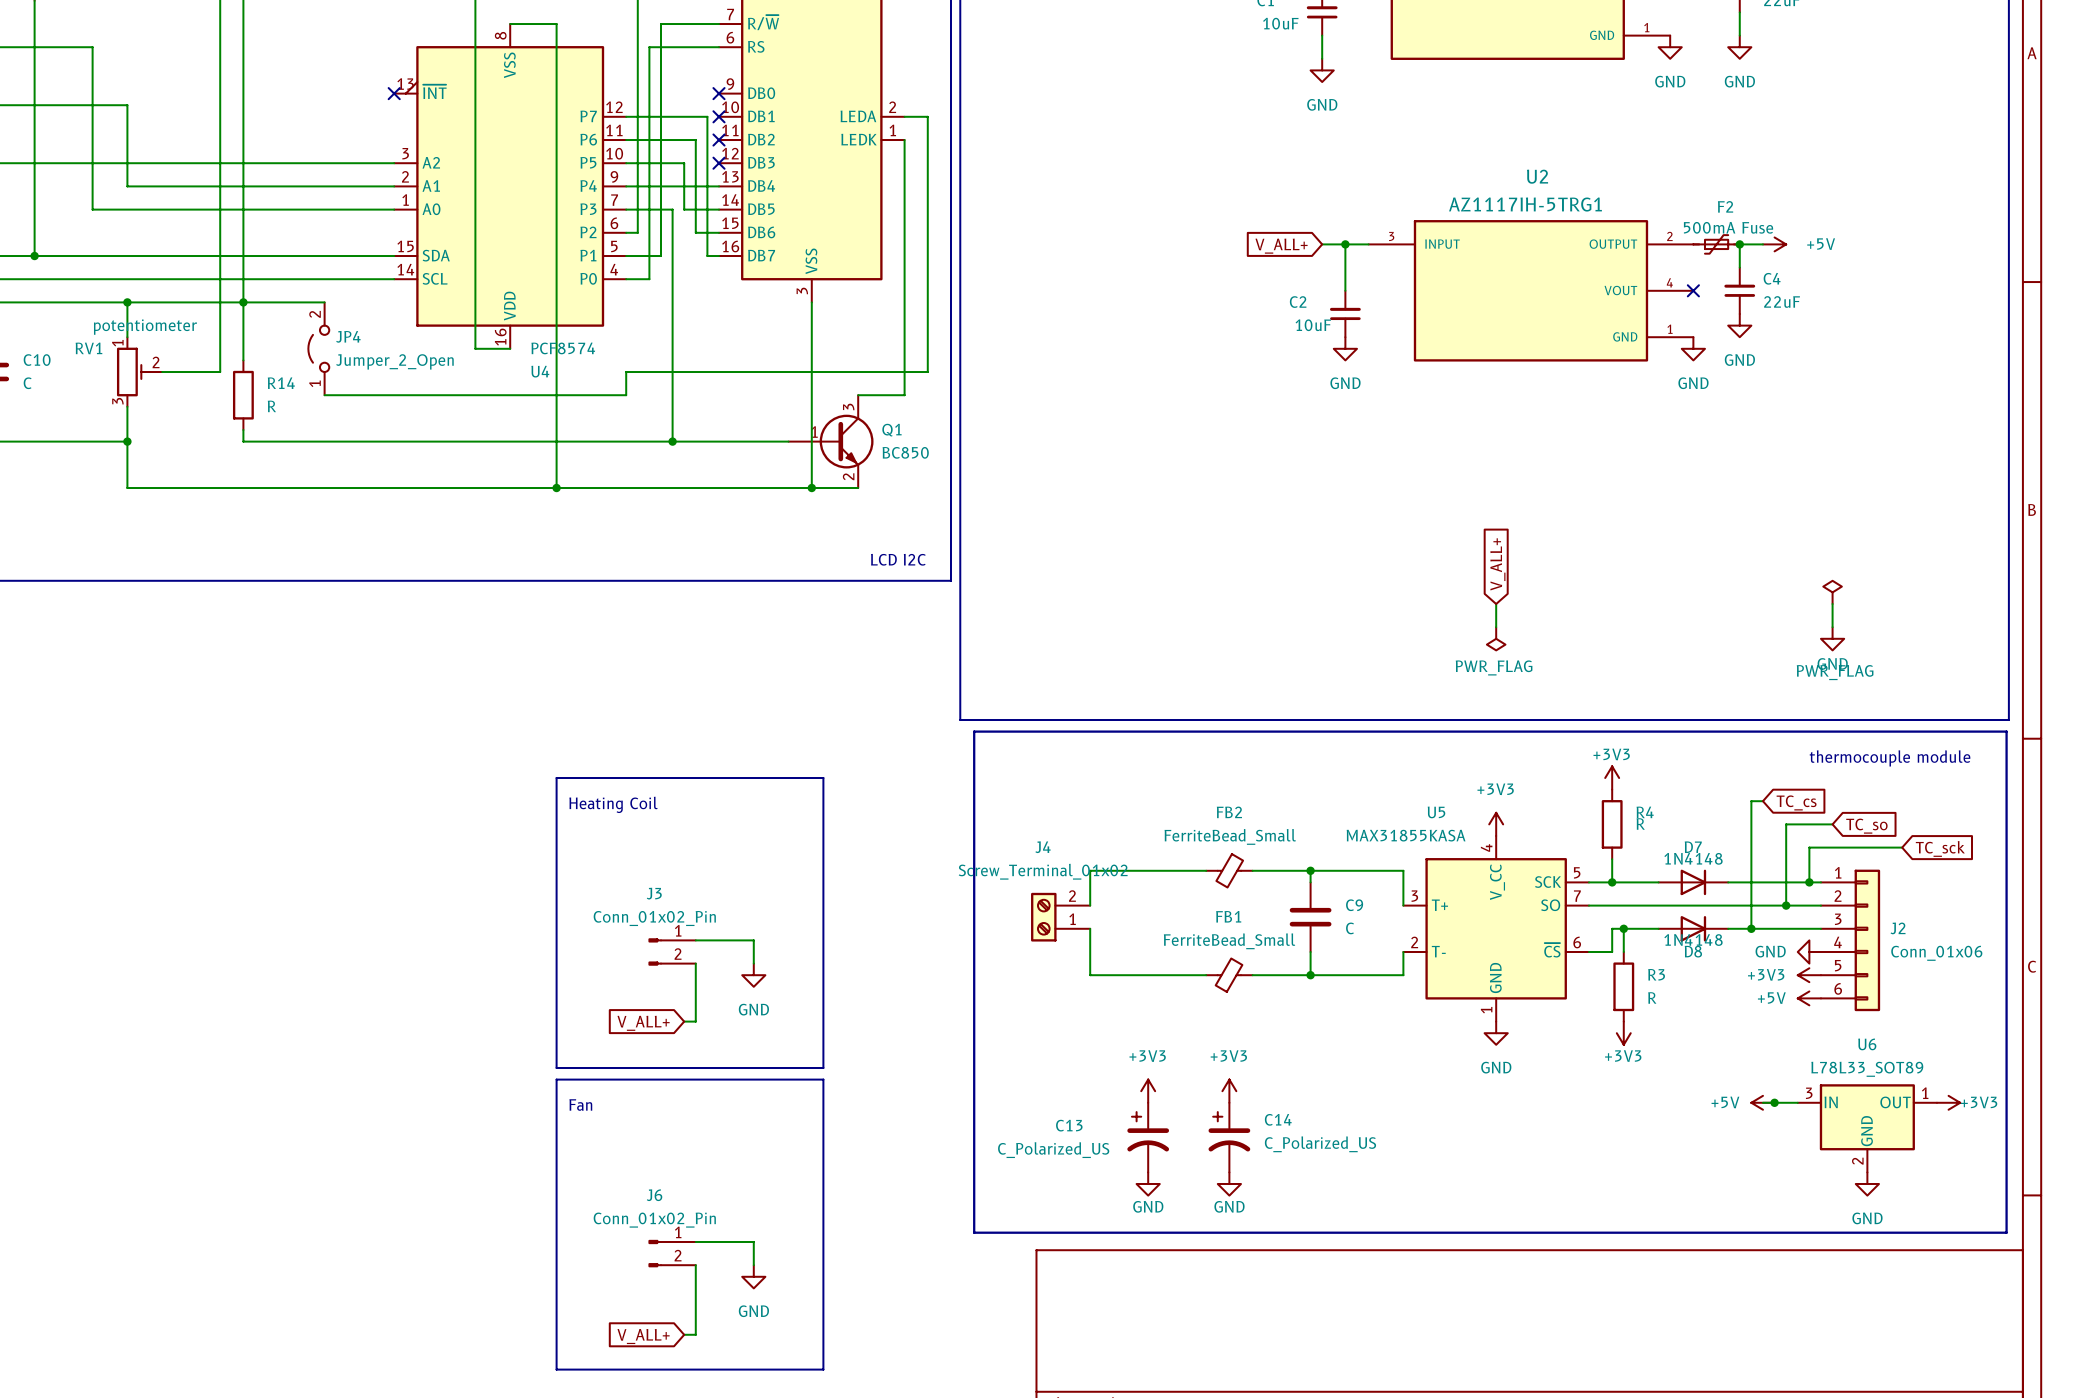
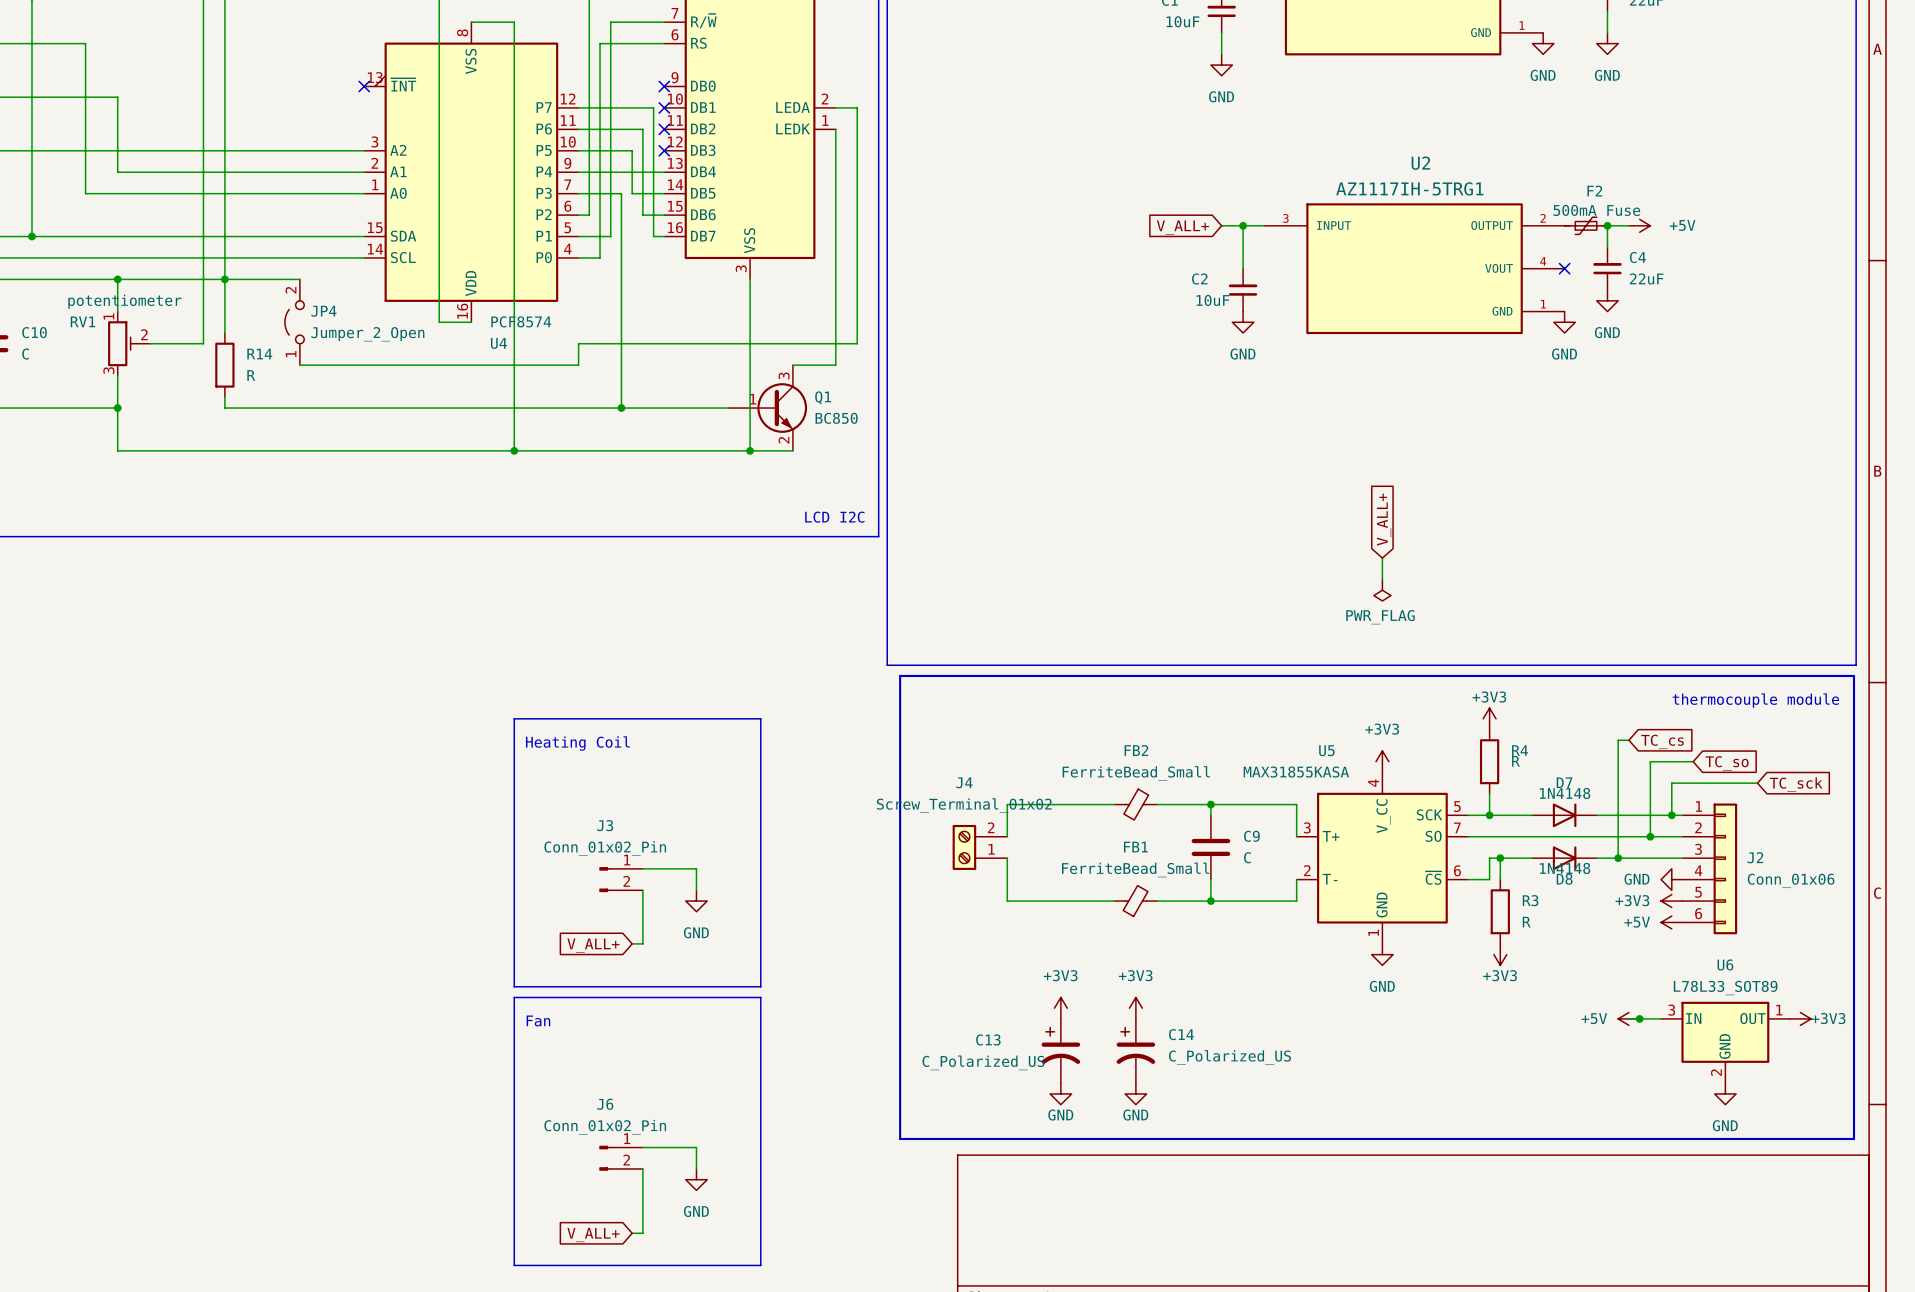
power symbol: PWR_FLAG (1832, 592) -> none
wire: (1832, 604) (1832, 627) -> none
power symbol: GND (1832, 638) -> none

